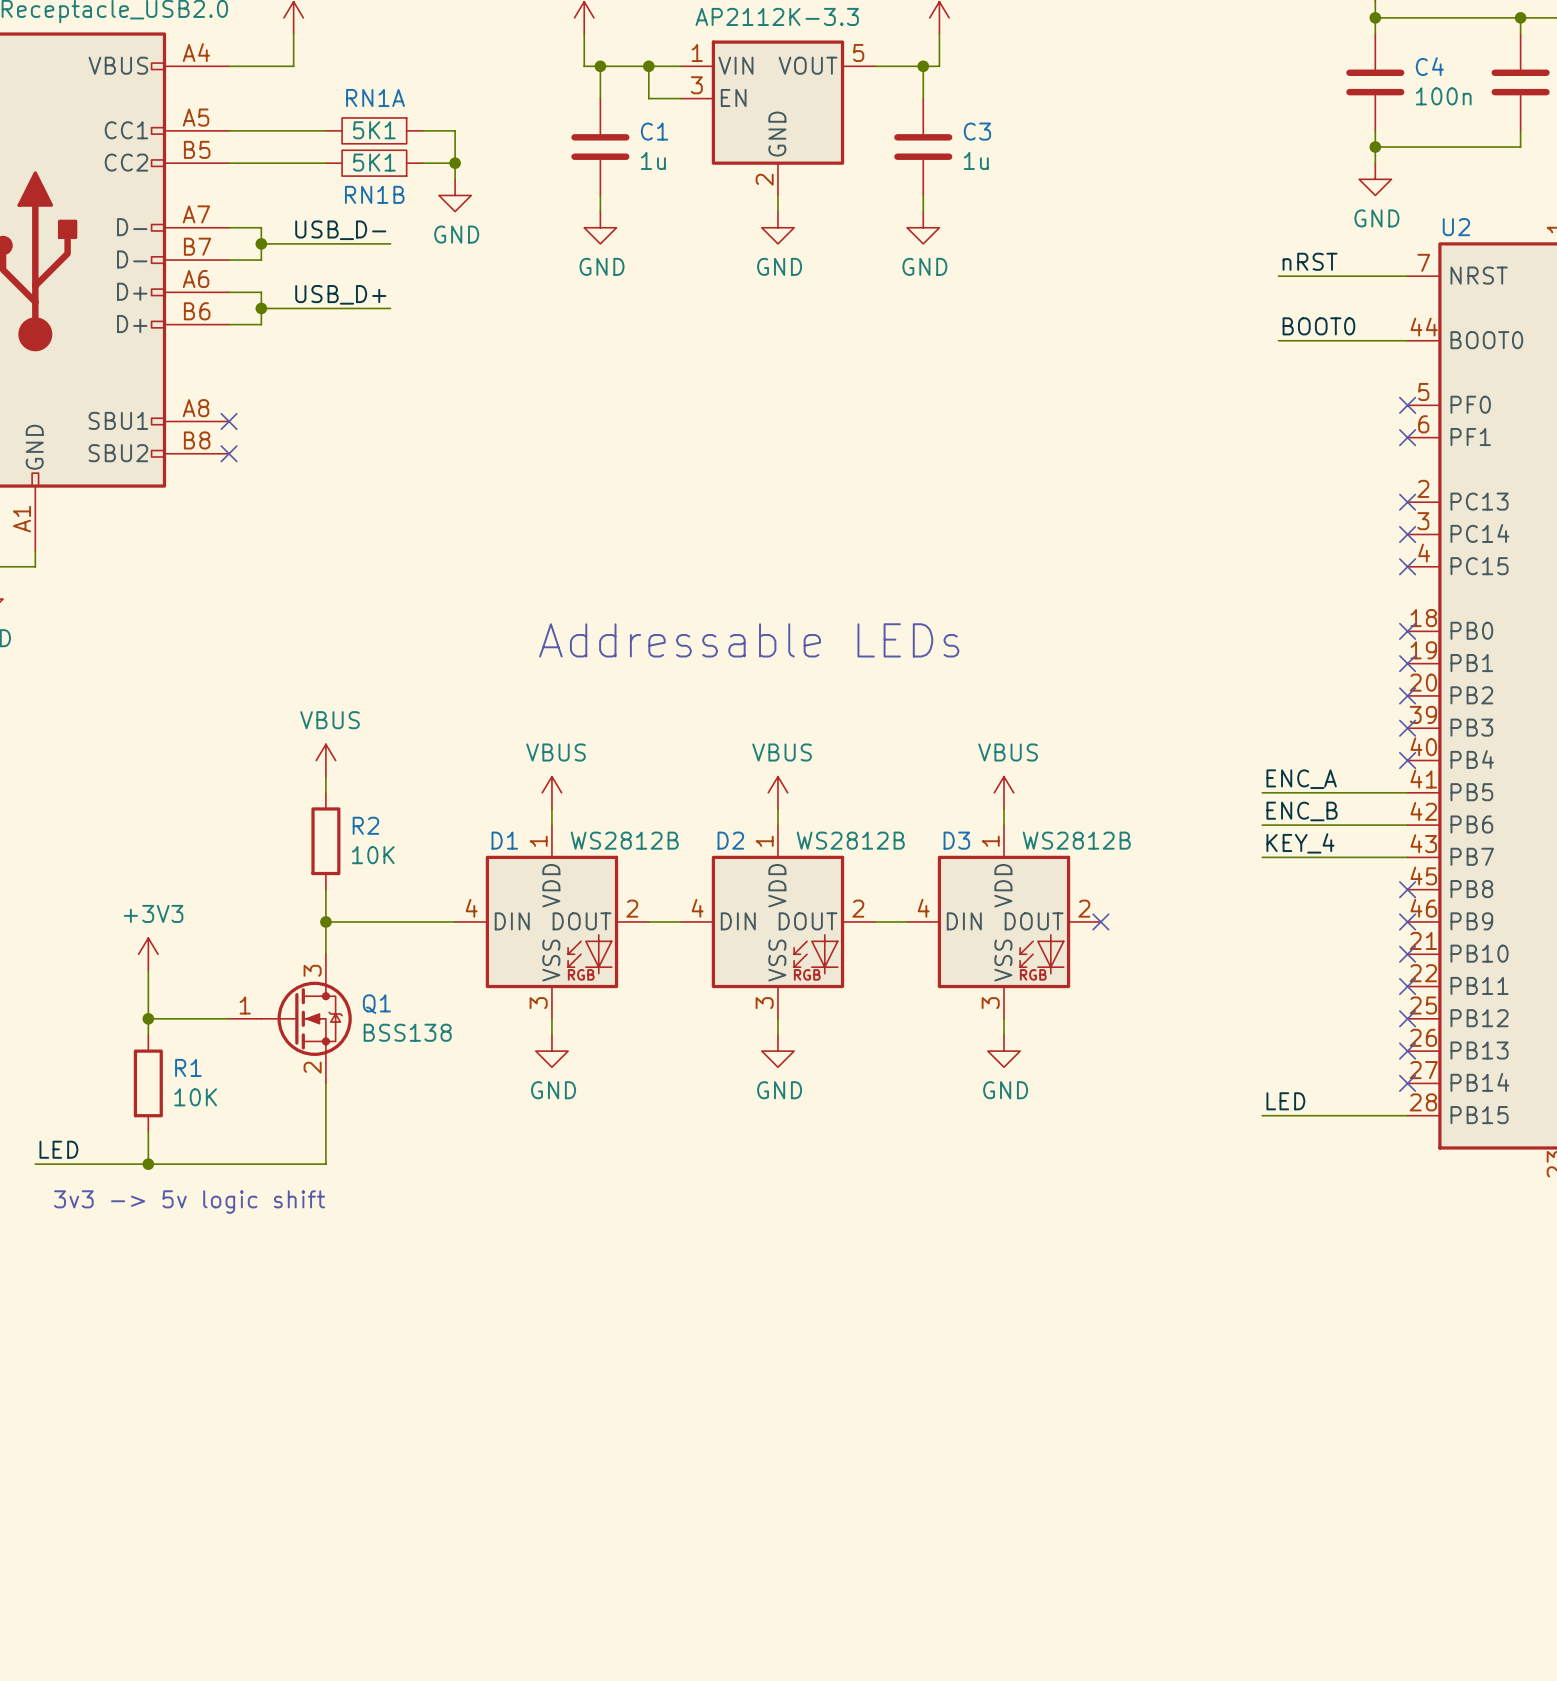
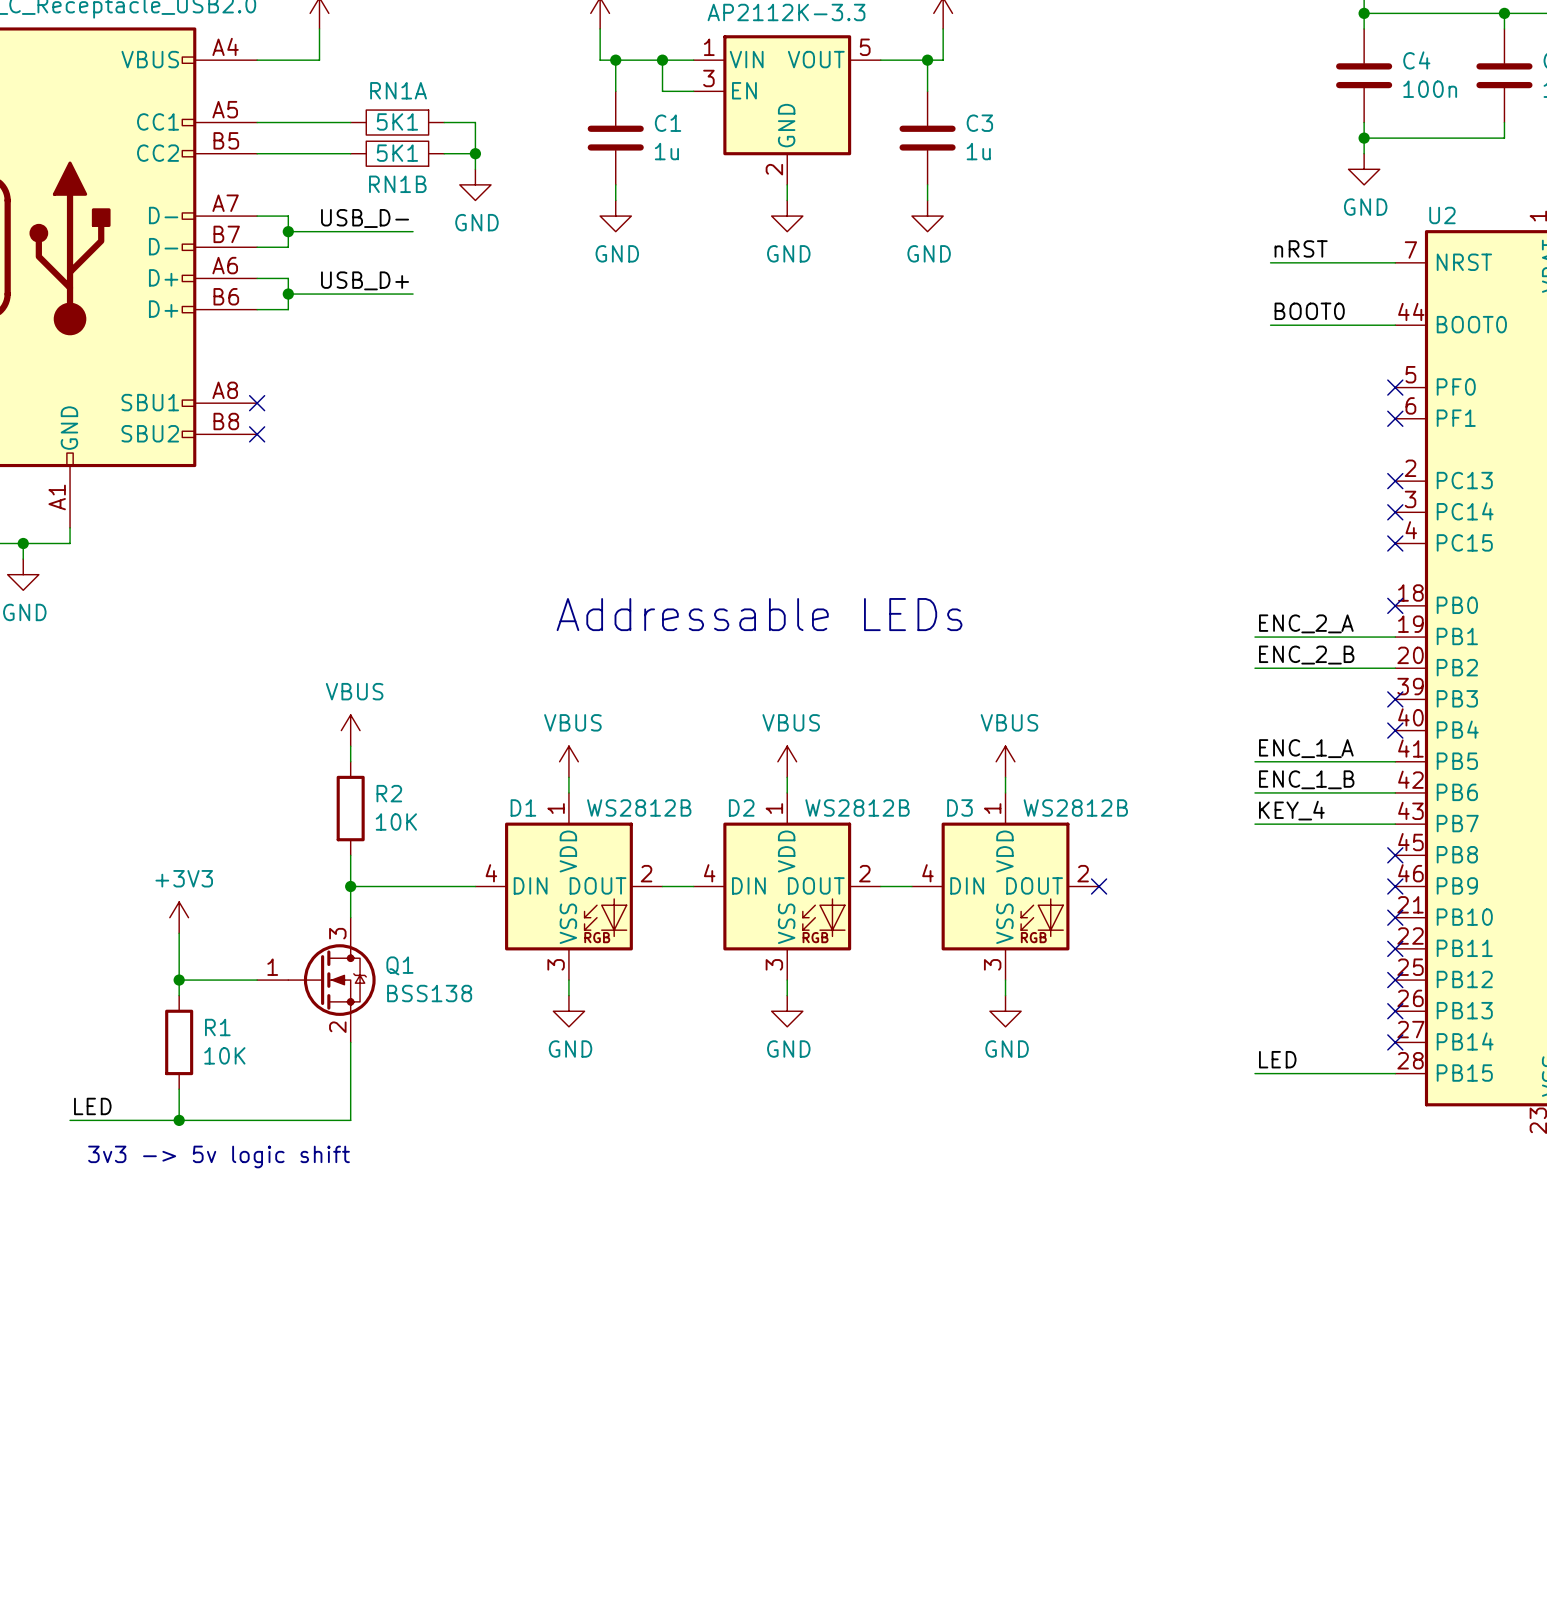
label: none -> ENC_2_A (1306, 623)
wire: none -> (1254, 637) (1395, 637)
no-connect mark: (1407, 663) -> none
label: none -> ENC_2_B (1306, 655)
wire: none -> (1254, 668) (1395, 668)
no-connect mark: (1407, 695) -> none
label: ENC_A (1301, 779) -> ENC_1_A (1306, 748)
label: ENC_B (1302, 811) -> ENC_1_B (1306, 779)

